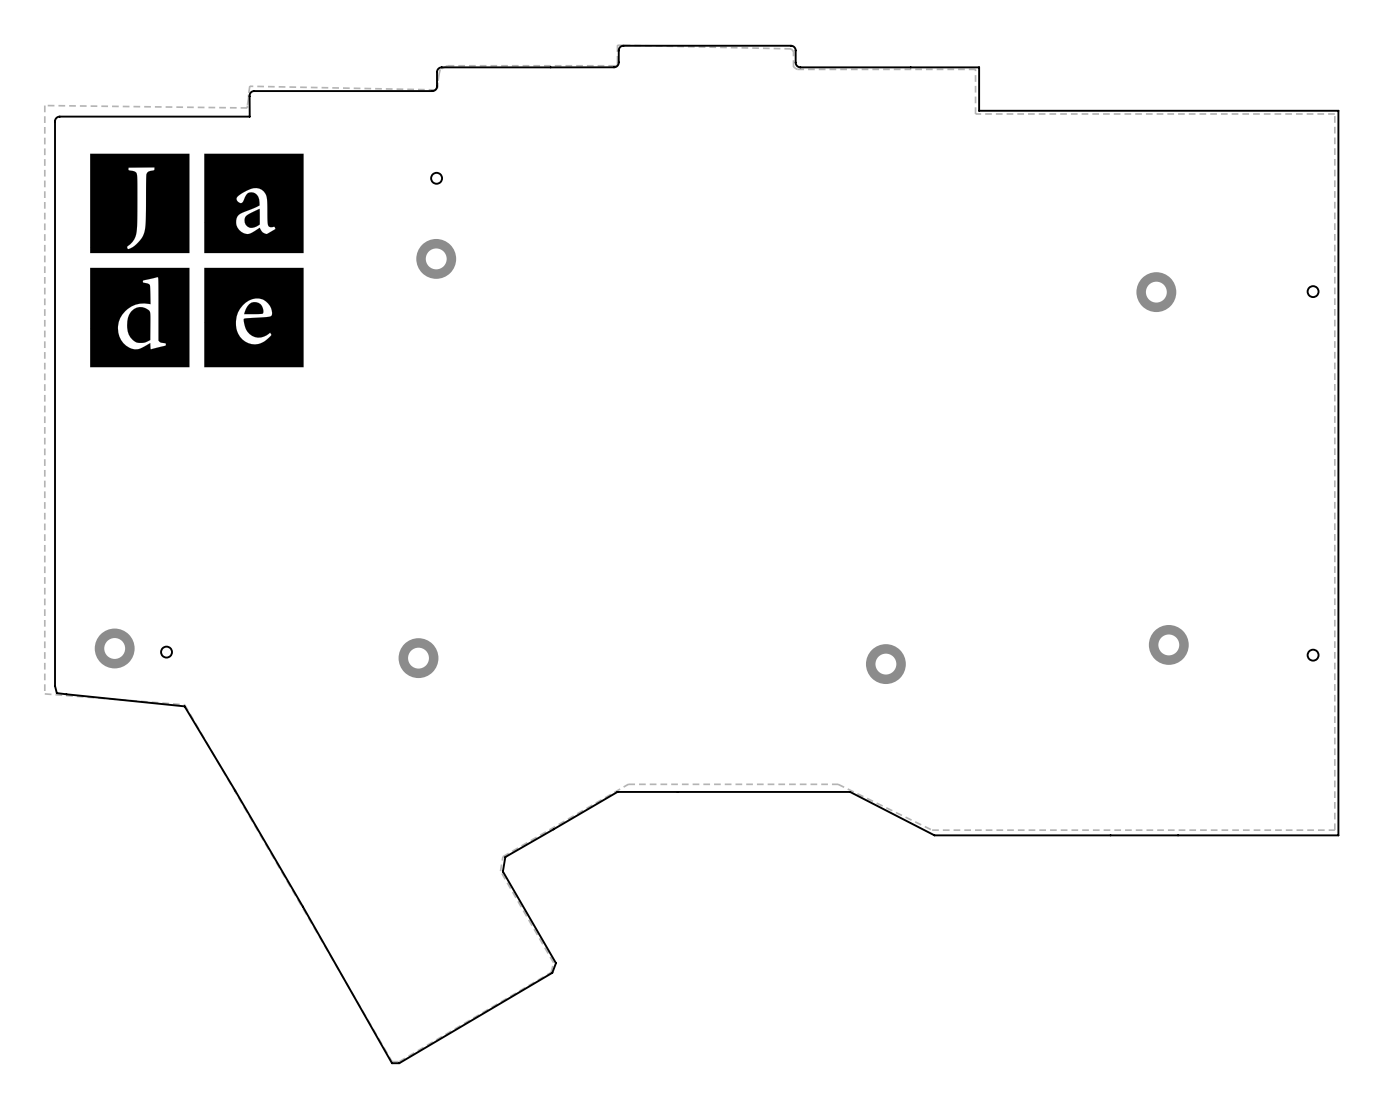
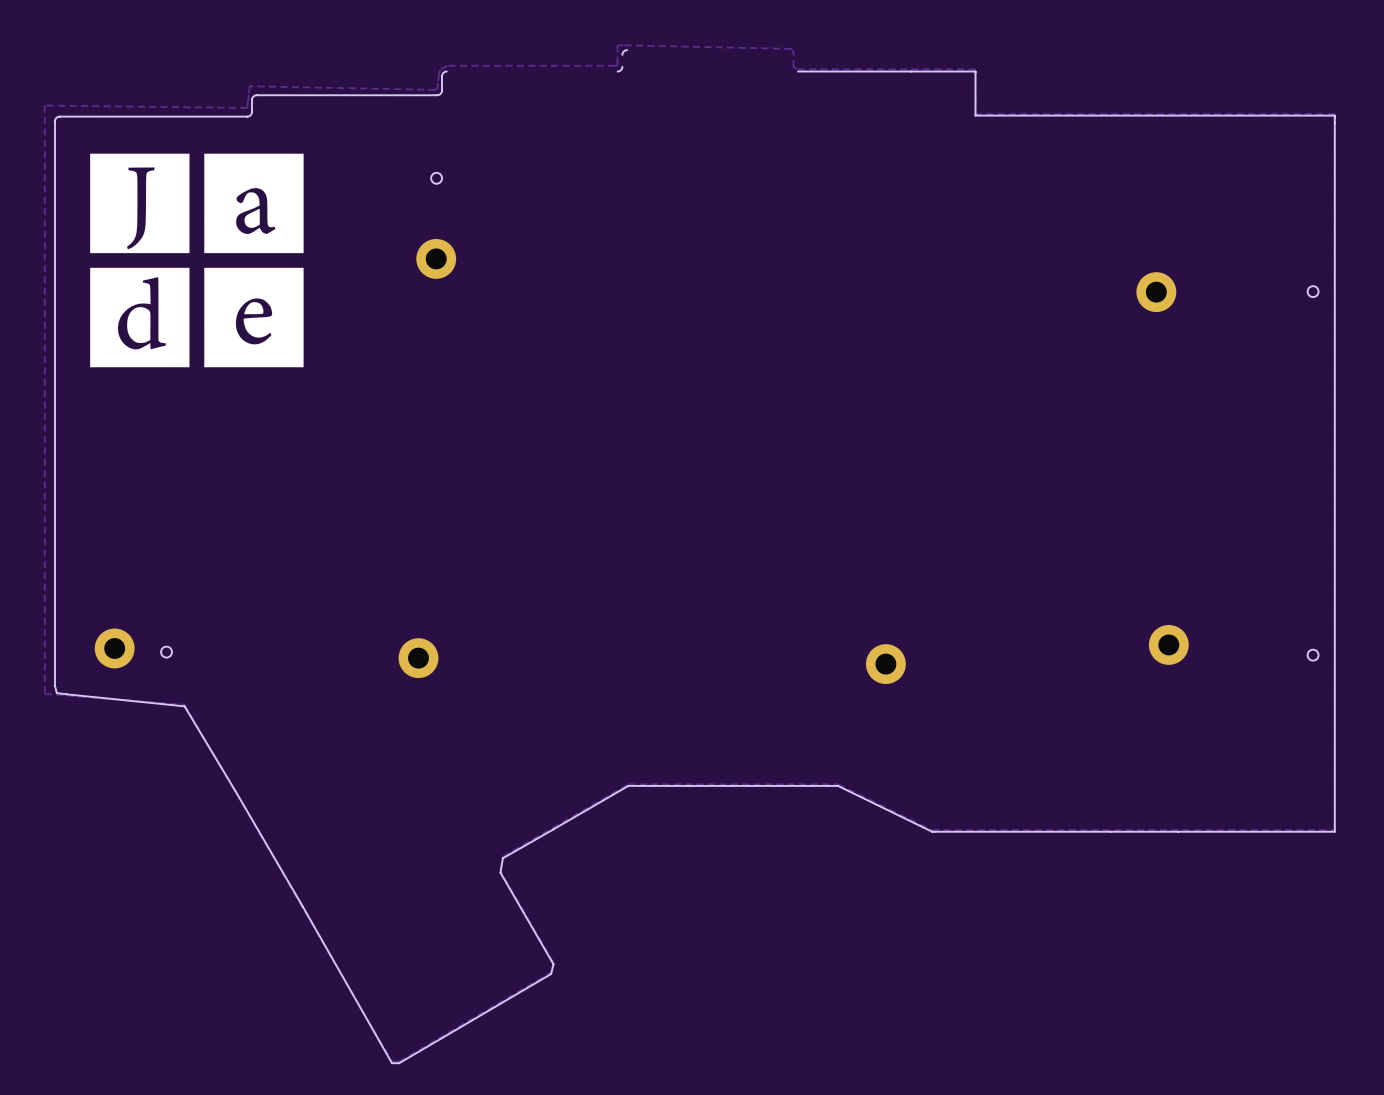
board edge: none -> (627, 50) (622, 54)
board edge: none -> (622, 66) (617, 71)
board edge: none -> (446, 71) (442, 76)
board edge: none -> (442, 76) (442, 90)
board edge: none -> (442, 90) (437, 95) (256, 95) (252, 99) (251, 113) (247, 116)
board edge: (247, 116) (249, 116) (249, 94) (253, 91) (432, 91) (436, 87) (437, 71) (440, 67) (614, 67) (618, 63) (619, 48) (623, 45) (791, 45) (795, 49) (796, 64) (800, 67) (979, 67) (979, 110) (1338, 110) (1338, 835) (934, 835) (850, 791) (617, 791) (505, 857) (502, 871) (555, 963) (552, 972) (399, 1063) -> (798, 71) (975, 71) (975, 115) (1334, 115) (1334, 831) (932, 831) (838, 785) (628, 785) (502, 858) (500, 872) (553, 964) (551, 974) (399, 1063)

